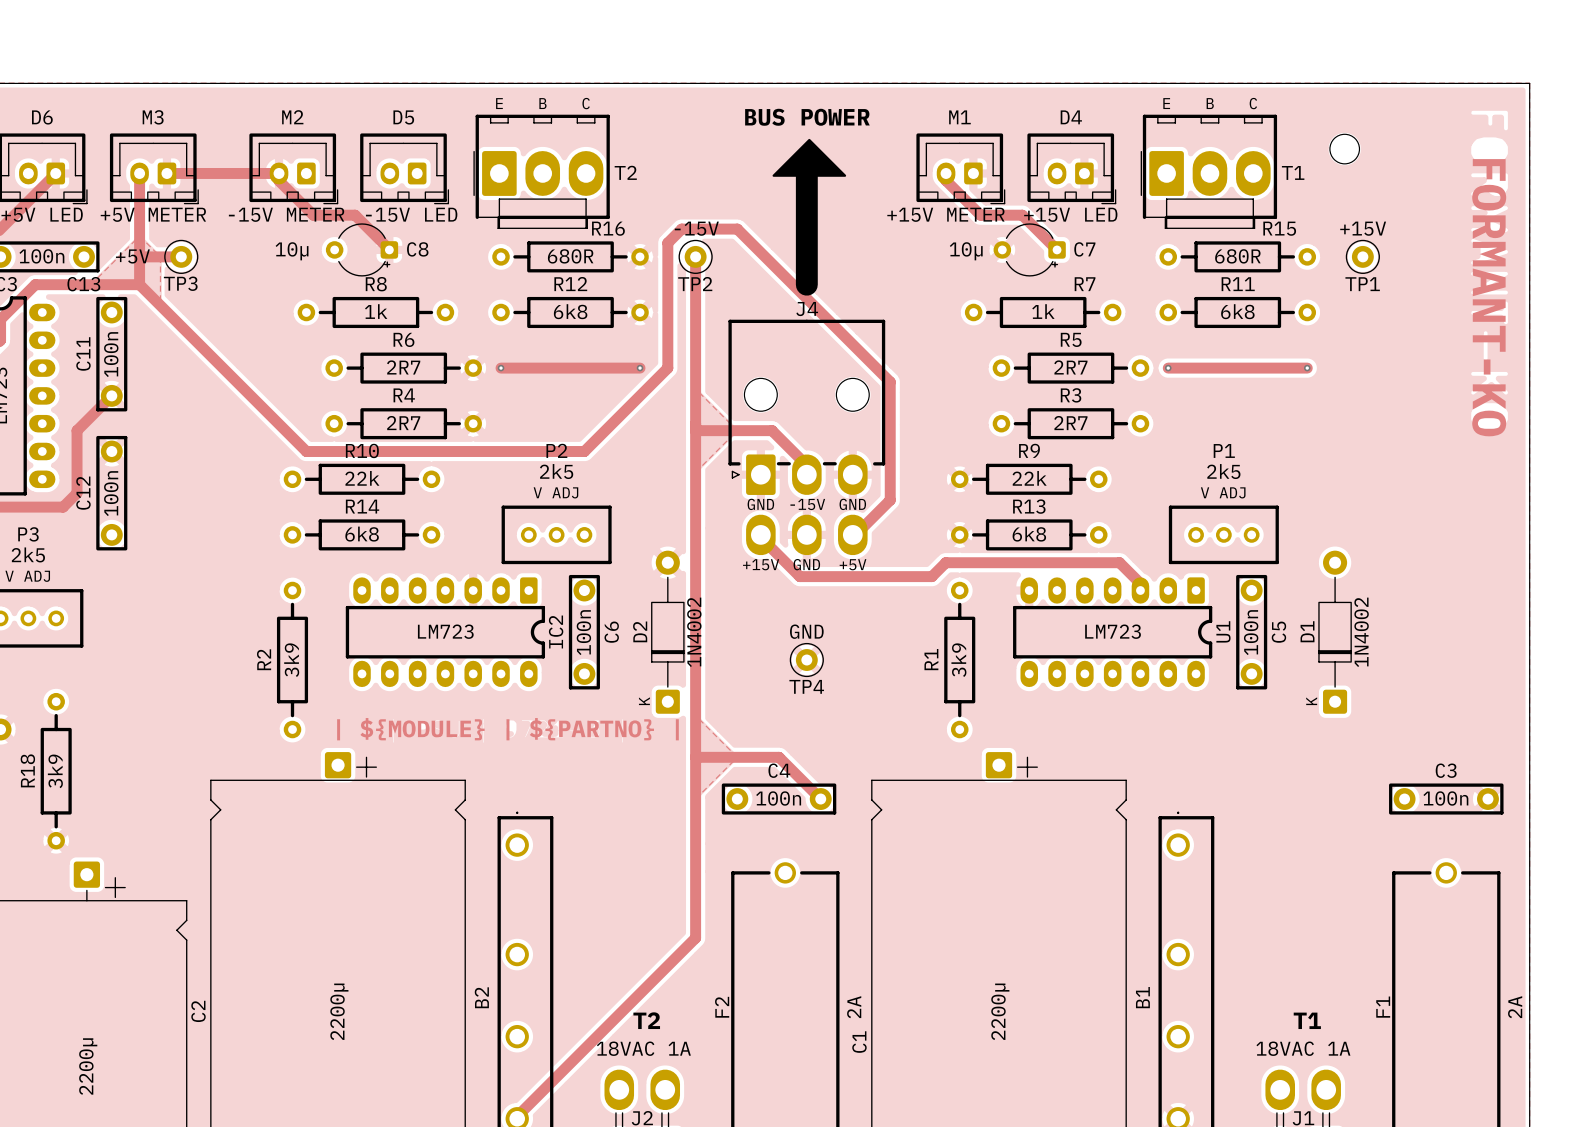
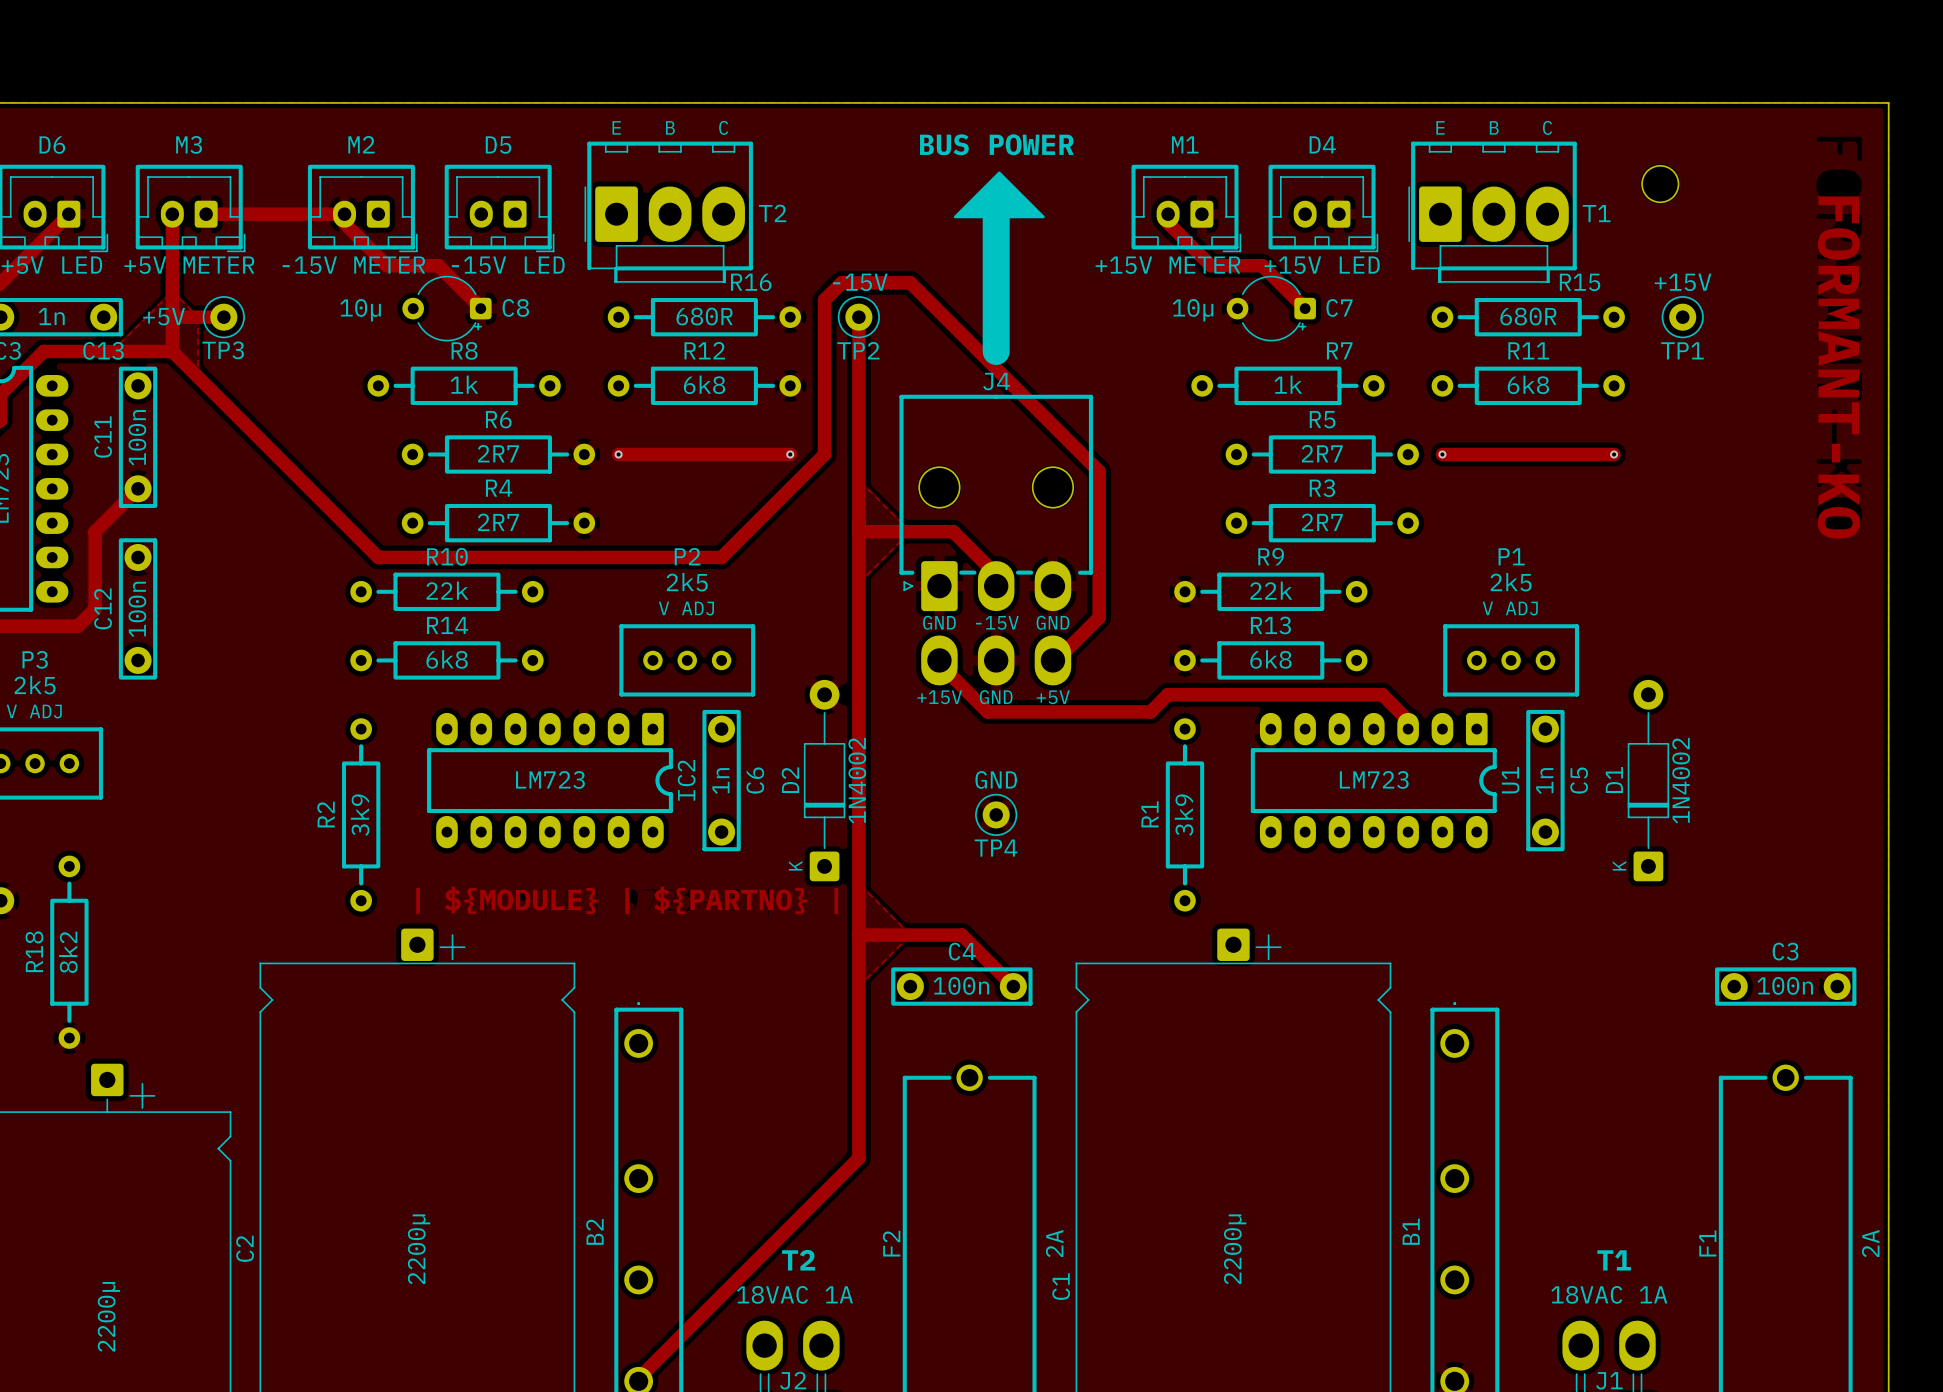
C13 value: 100n (41, 256) -> 1n (51, 316)
C6 value: 100n (583, 632) -> 1n (720, 781)
C5 value: 100n (1251, 632) -> 1n (1544, 781)
R18 value: 3k9 (55, 771) -> 8k2 (68, 952)

